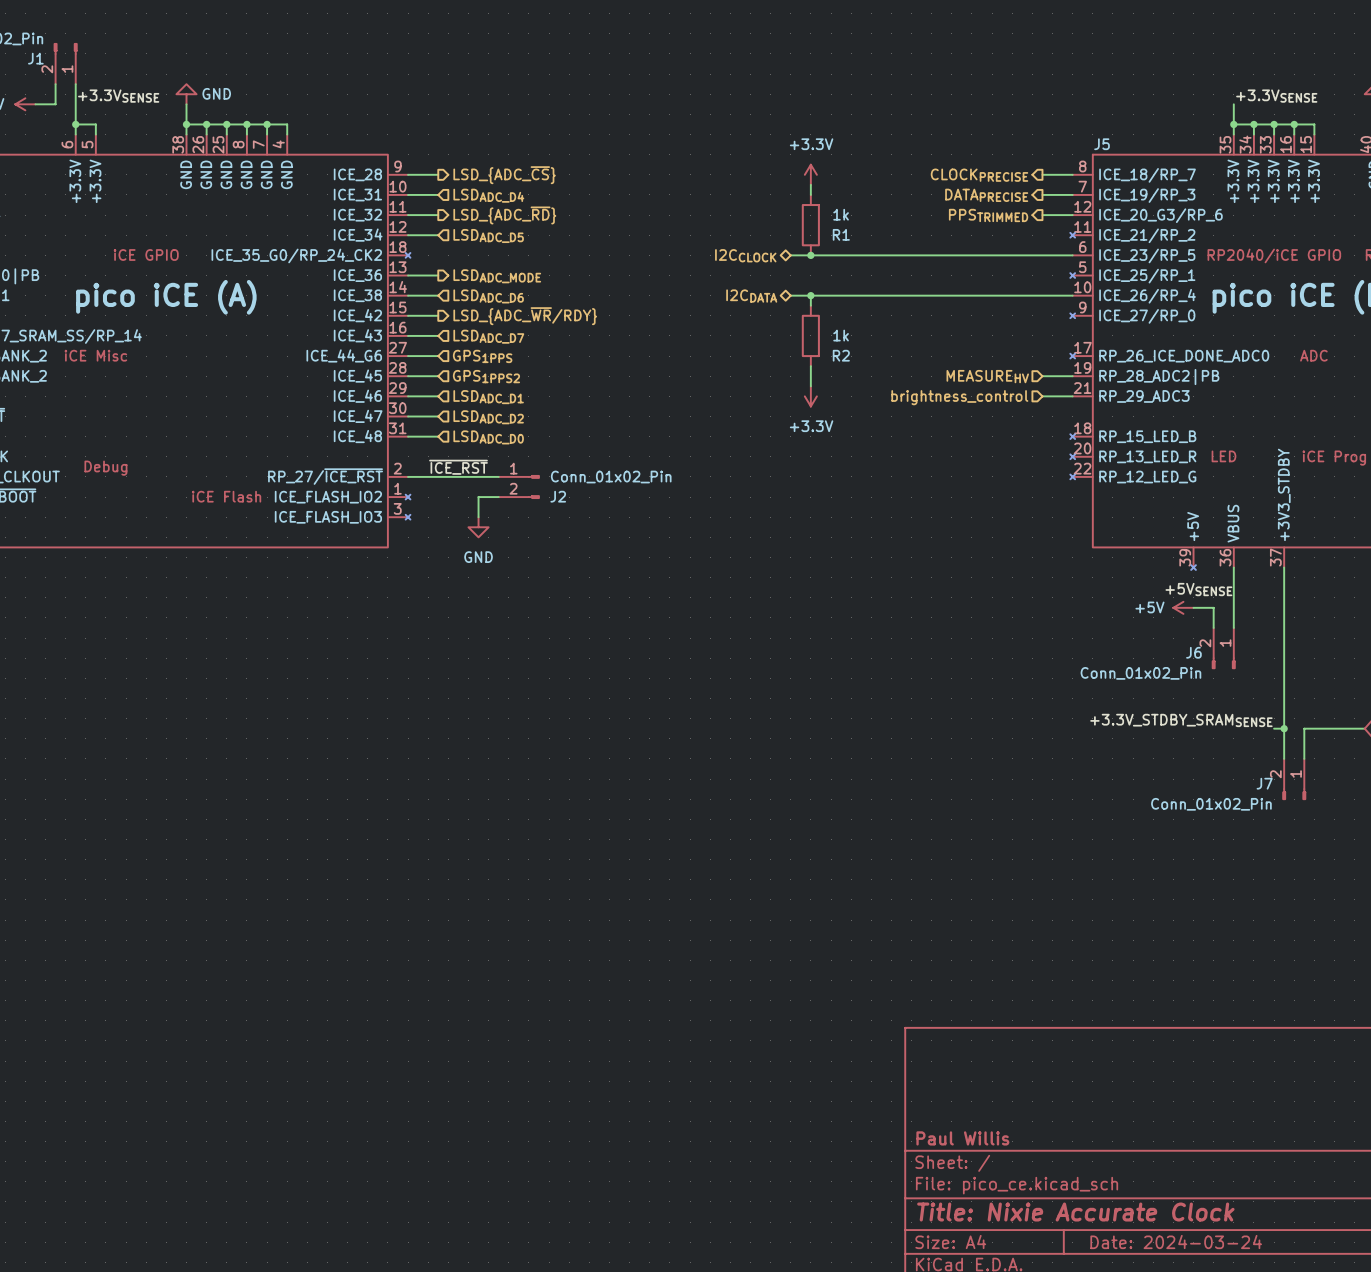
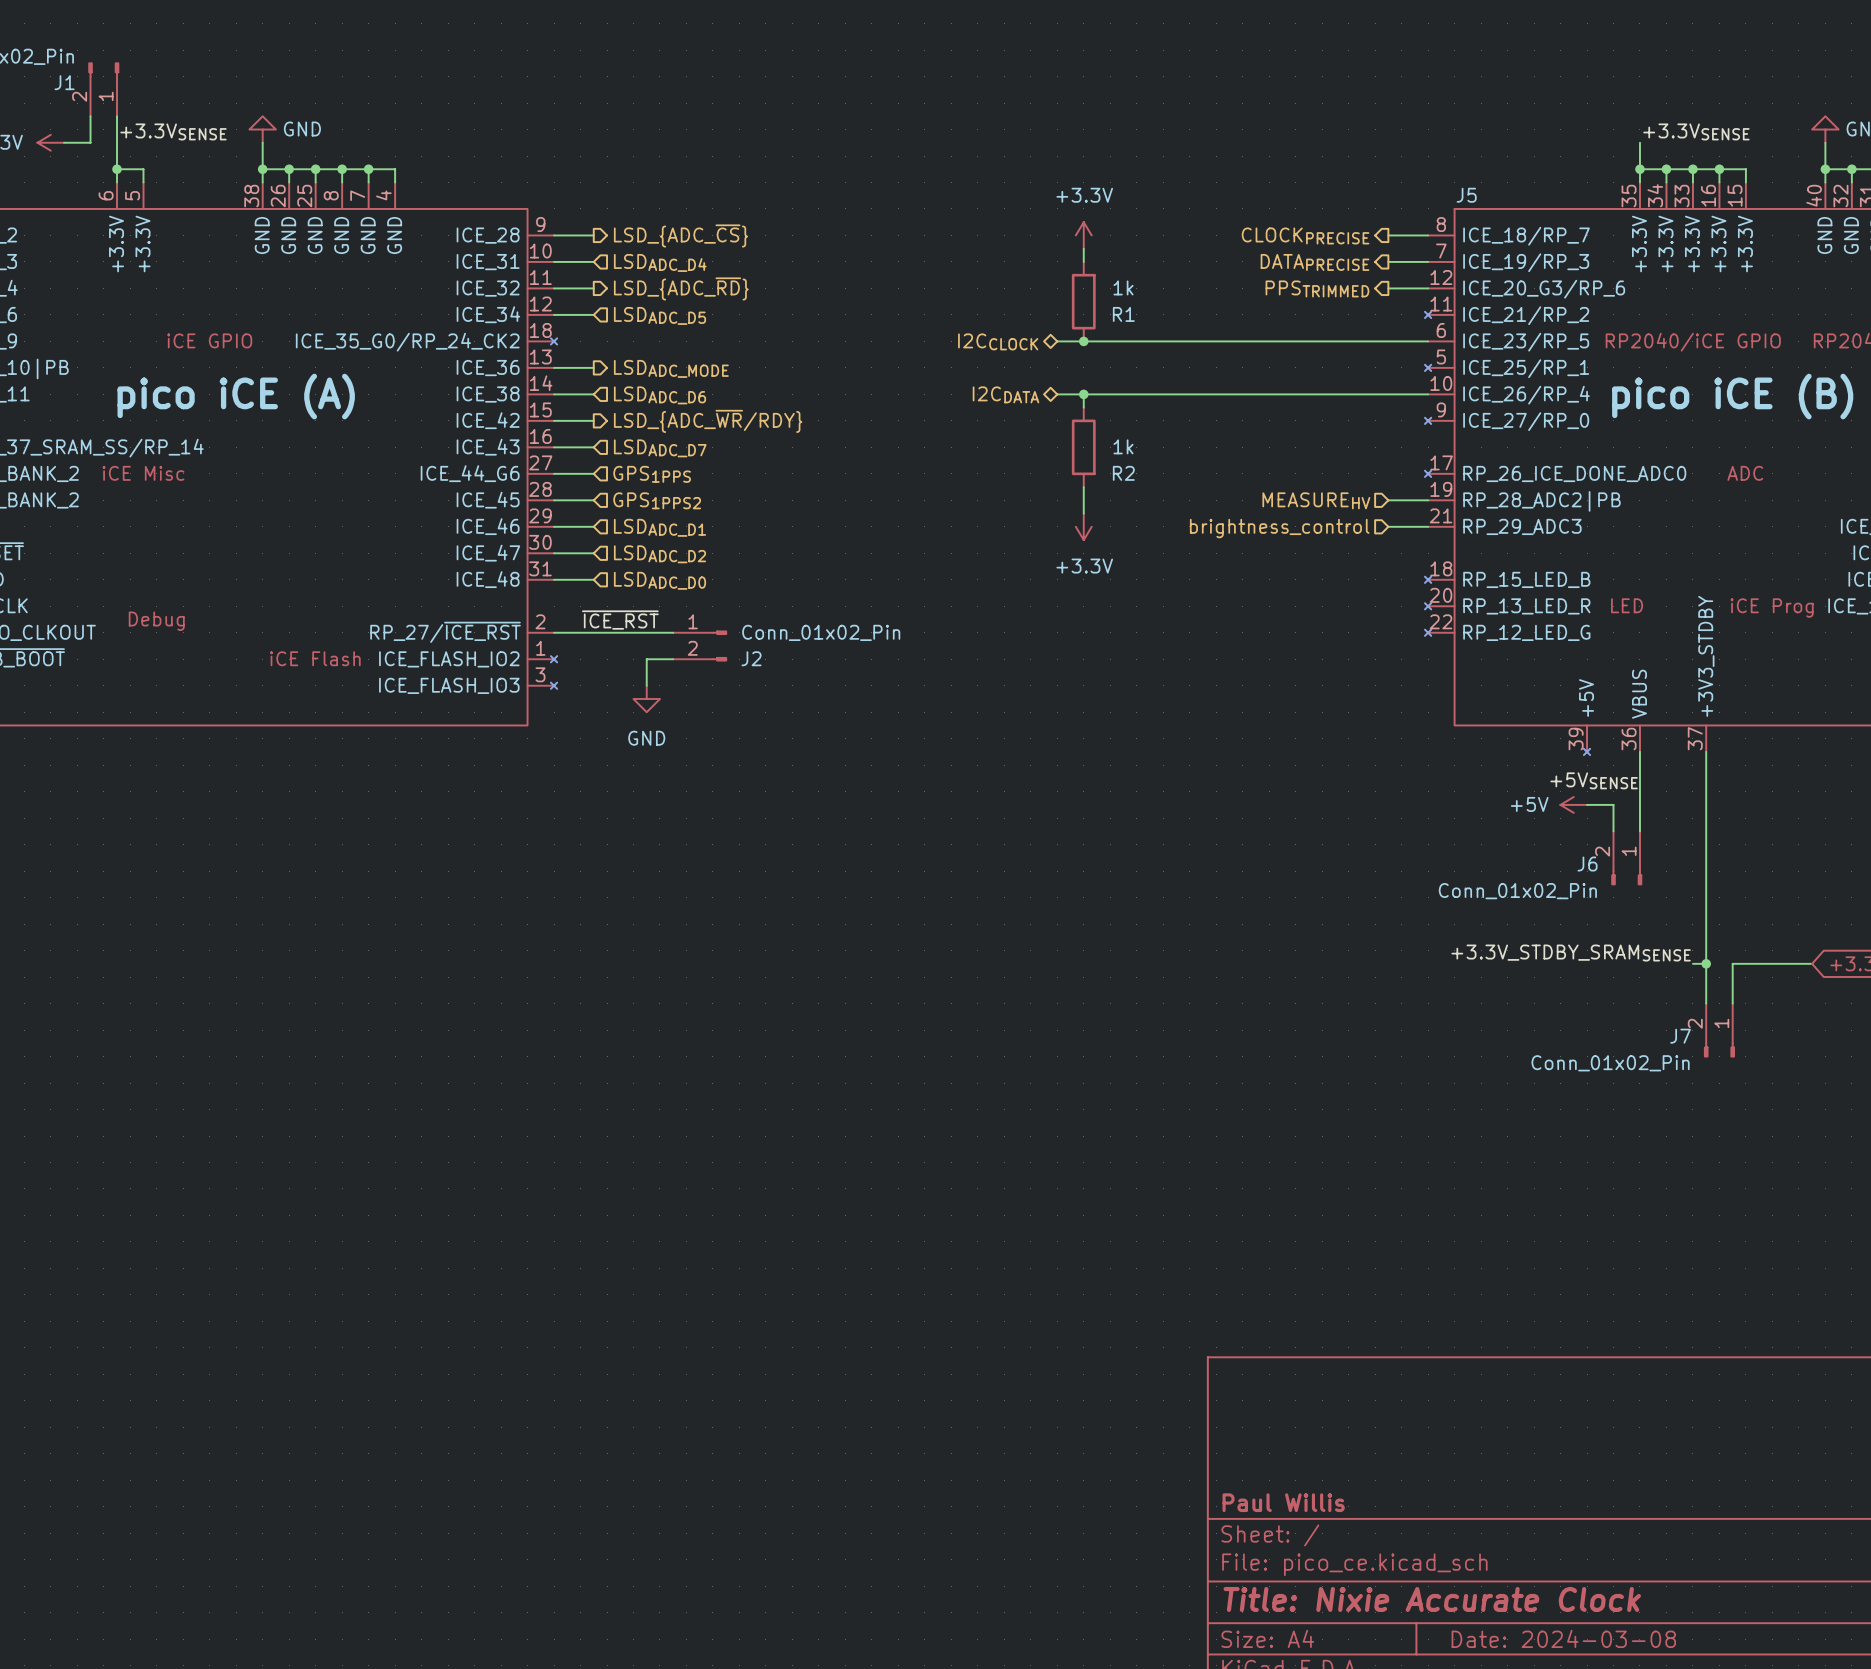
title block: Date: 2024-03-24 (1176, 1242) -> Date: 2024-03-08 (1563, 1638)

